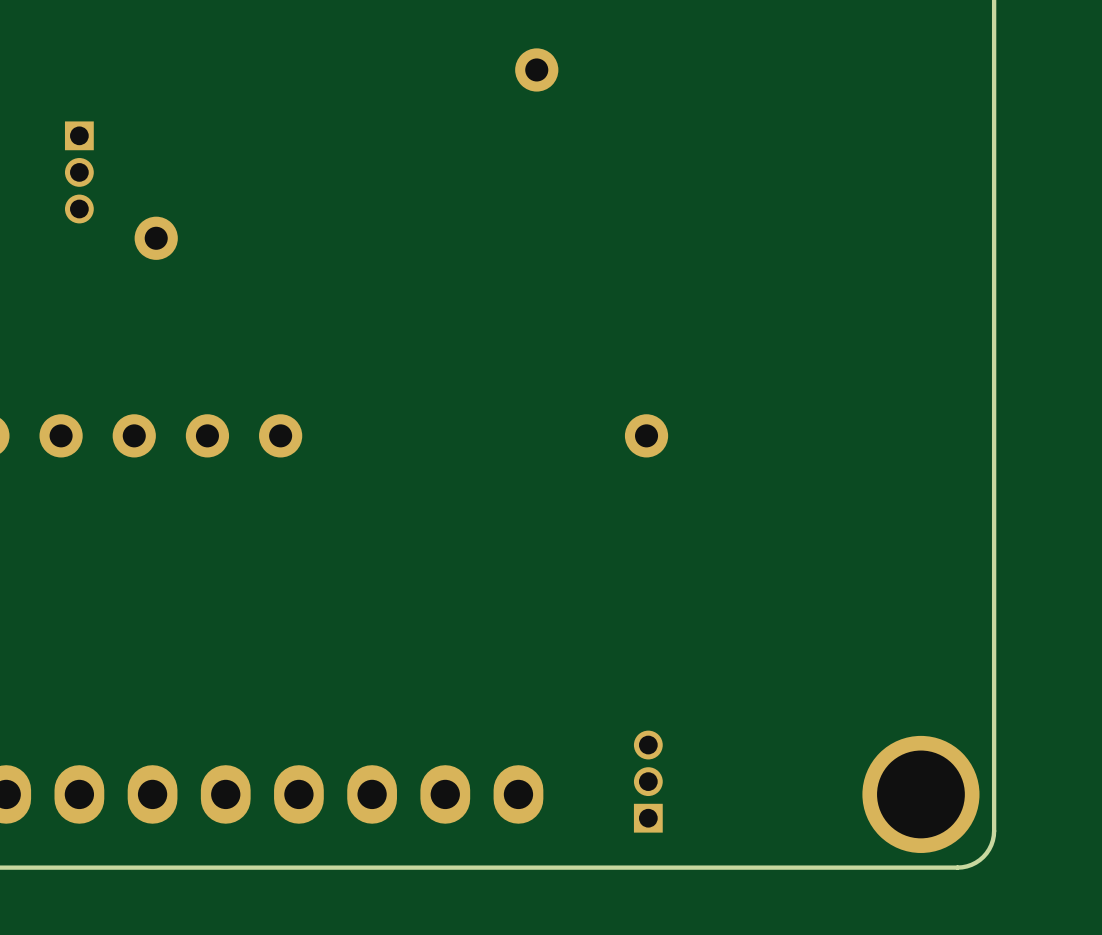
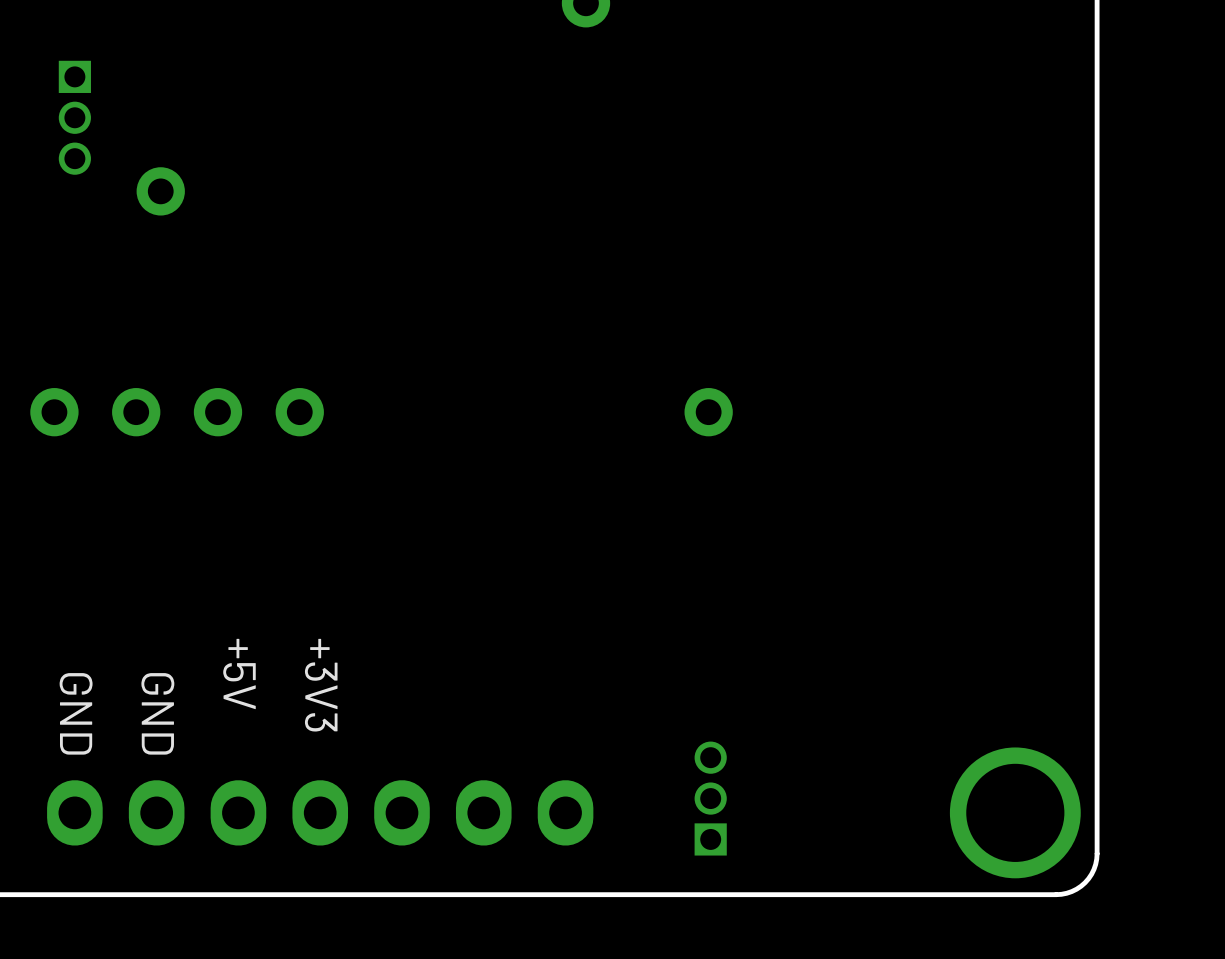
text: none -> +5V (239, 674)
text: none -> +3V3 (321, 685)
text: none -> GND (76, 713)
text: none -> GND (157, 713)

